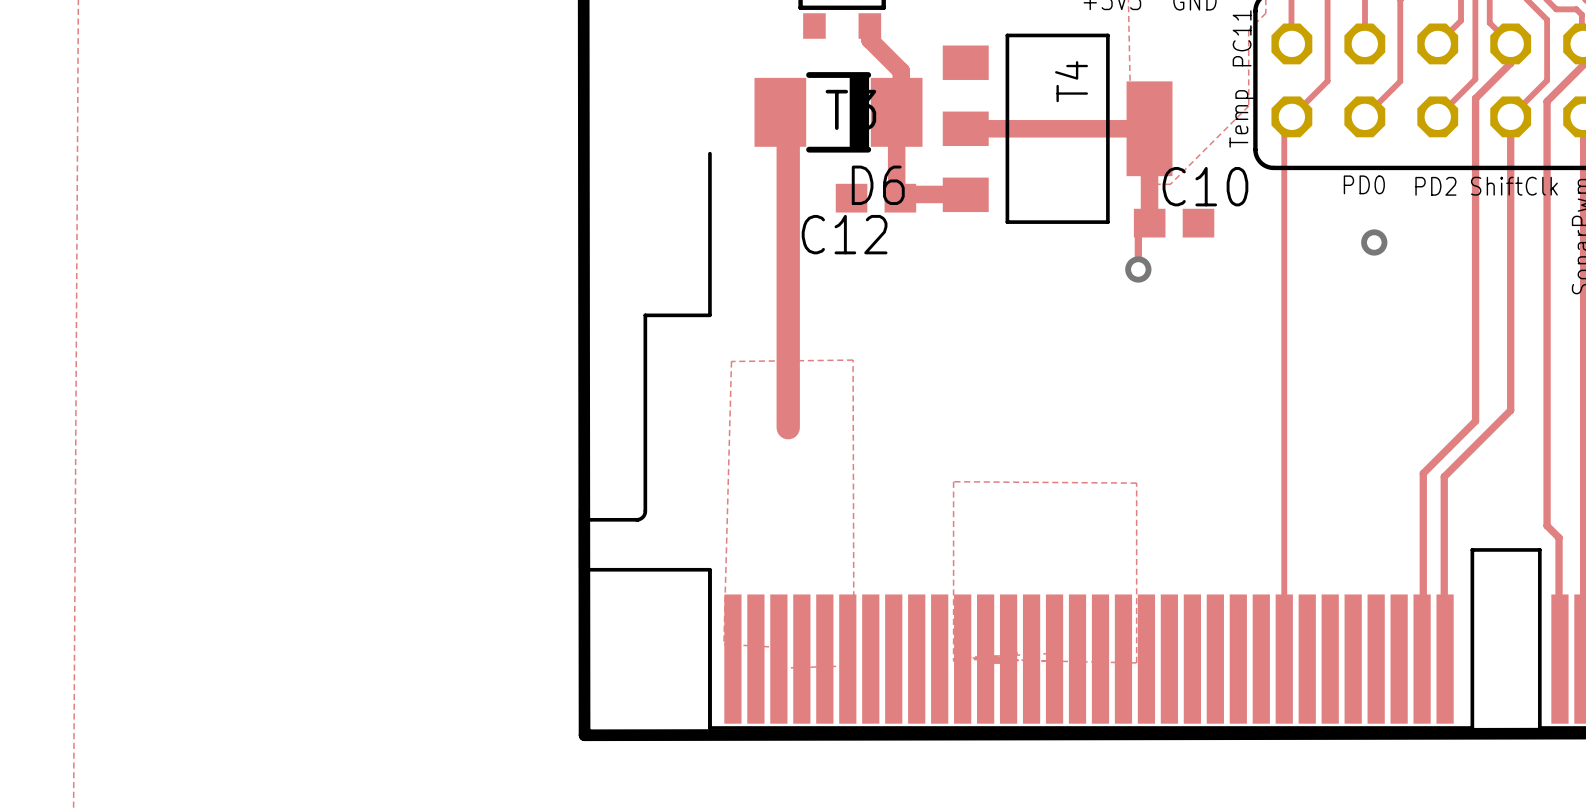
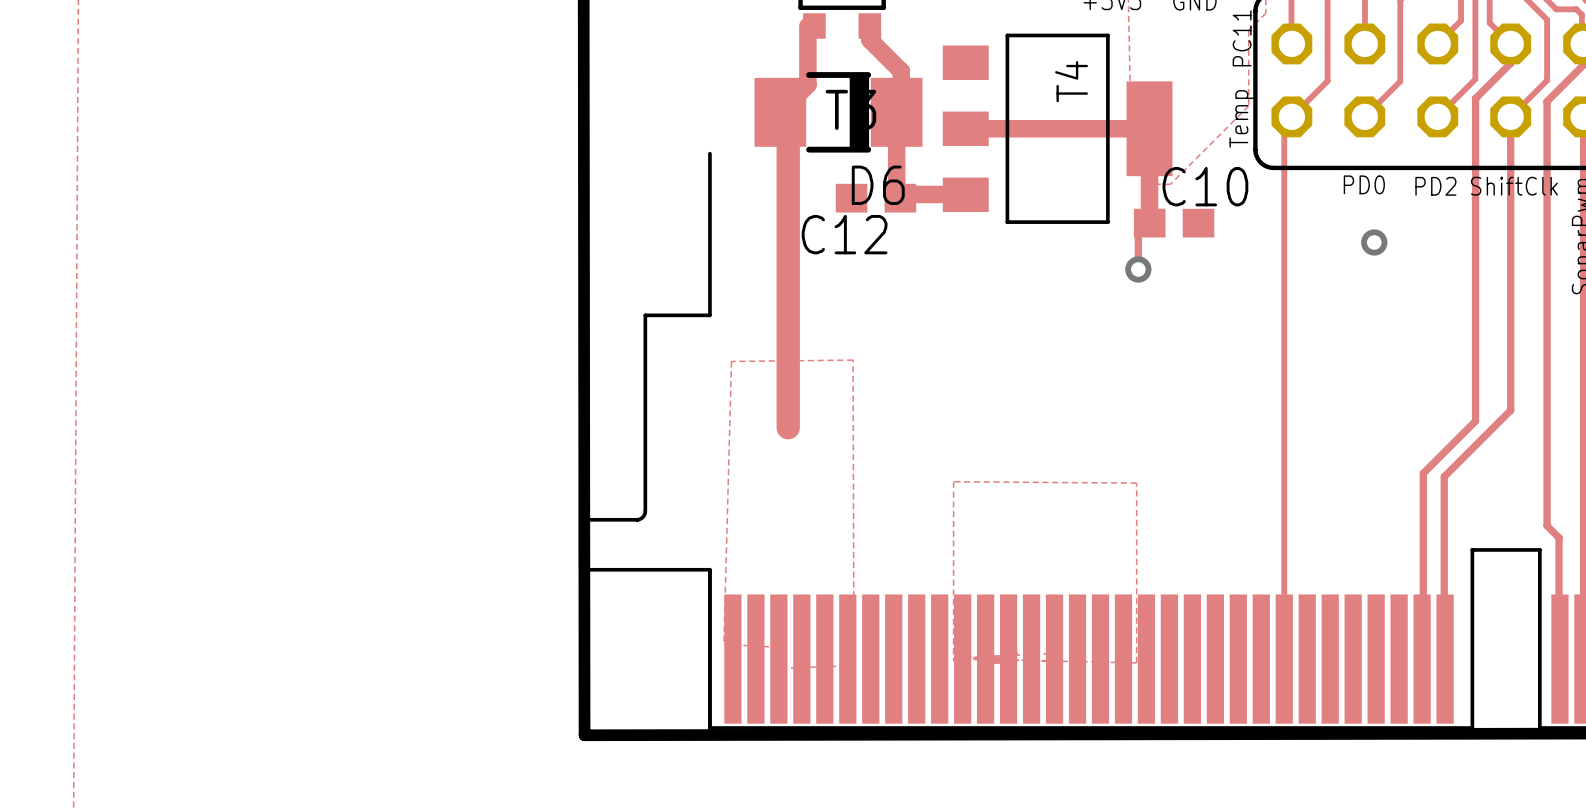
track: none -> (807, 26) (807, 84) (780, 112)

